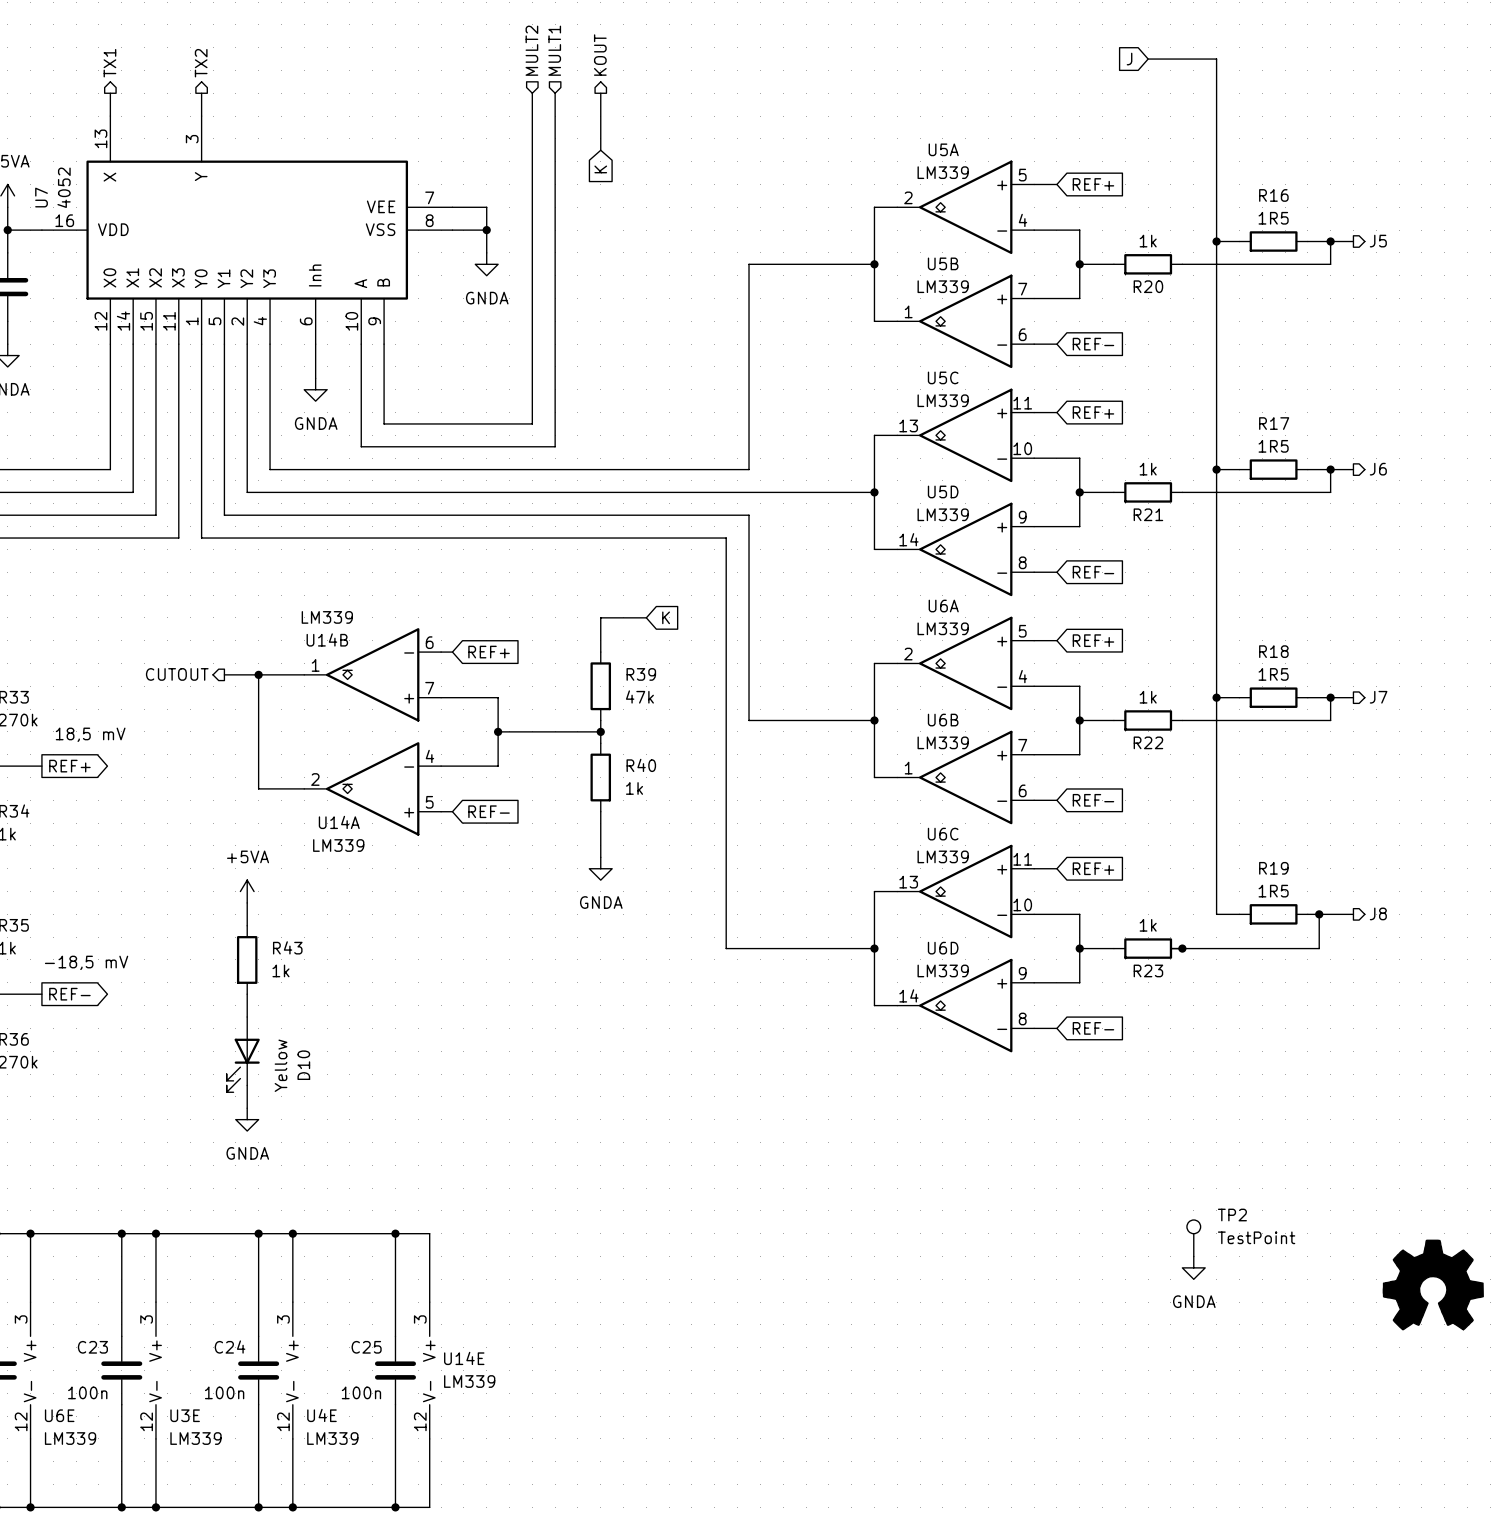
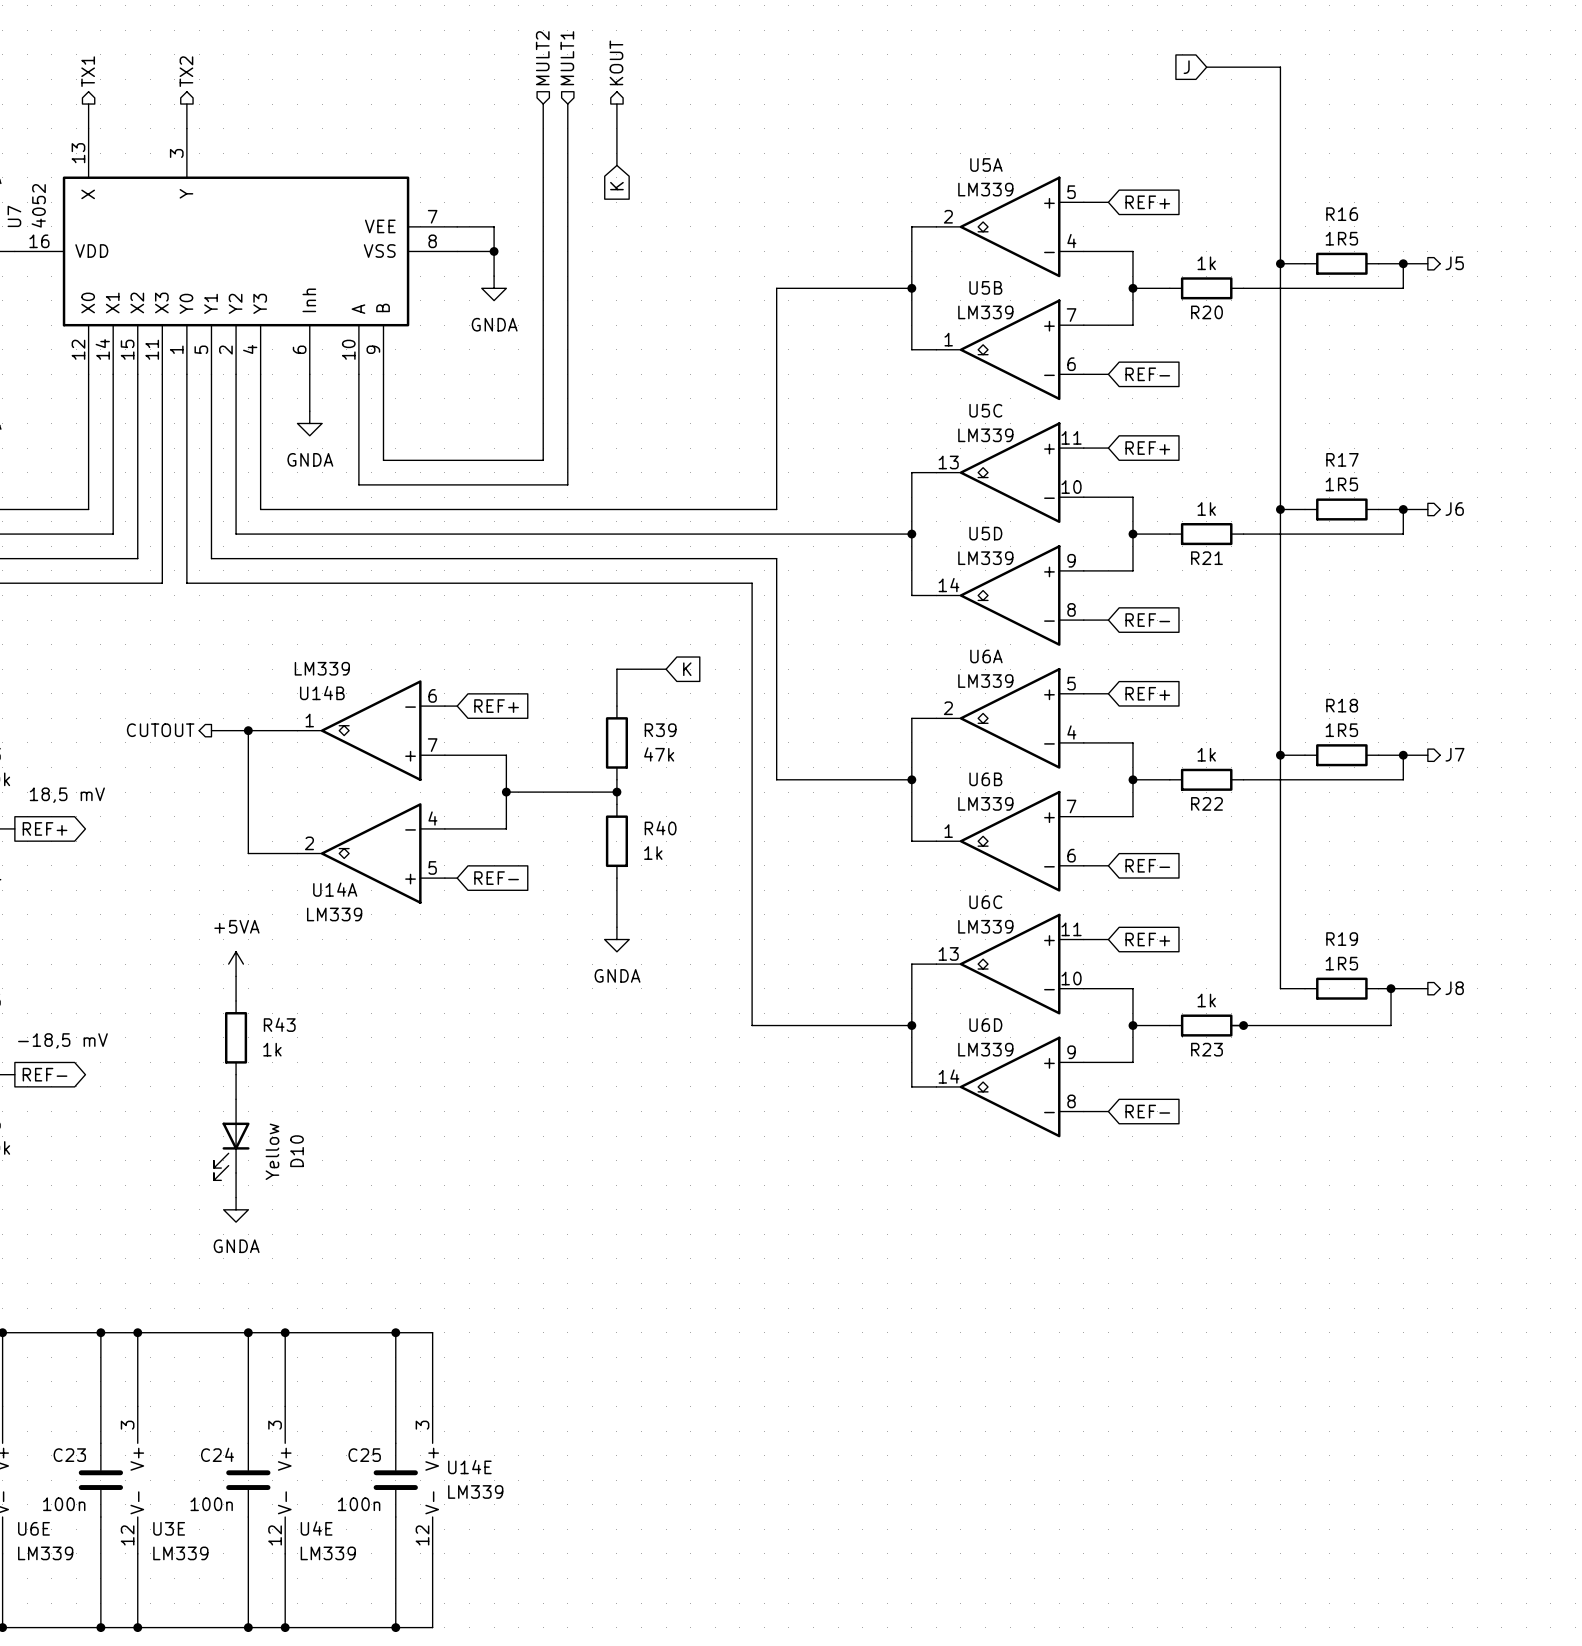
TP2: TestPoint (1193, 1238) -> none
power symbol: GNDA (1193, 1267) -> none
power symbol: (1433, 1285) -> none

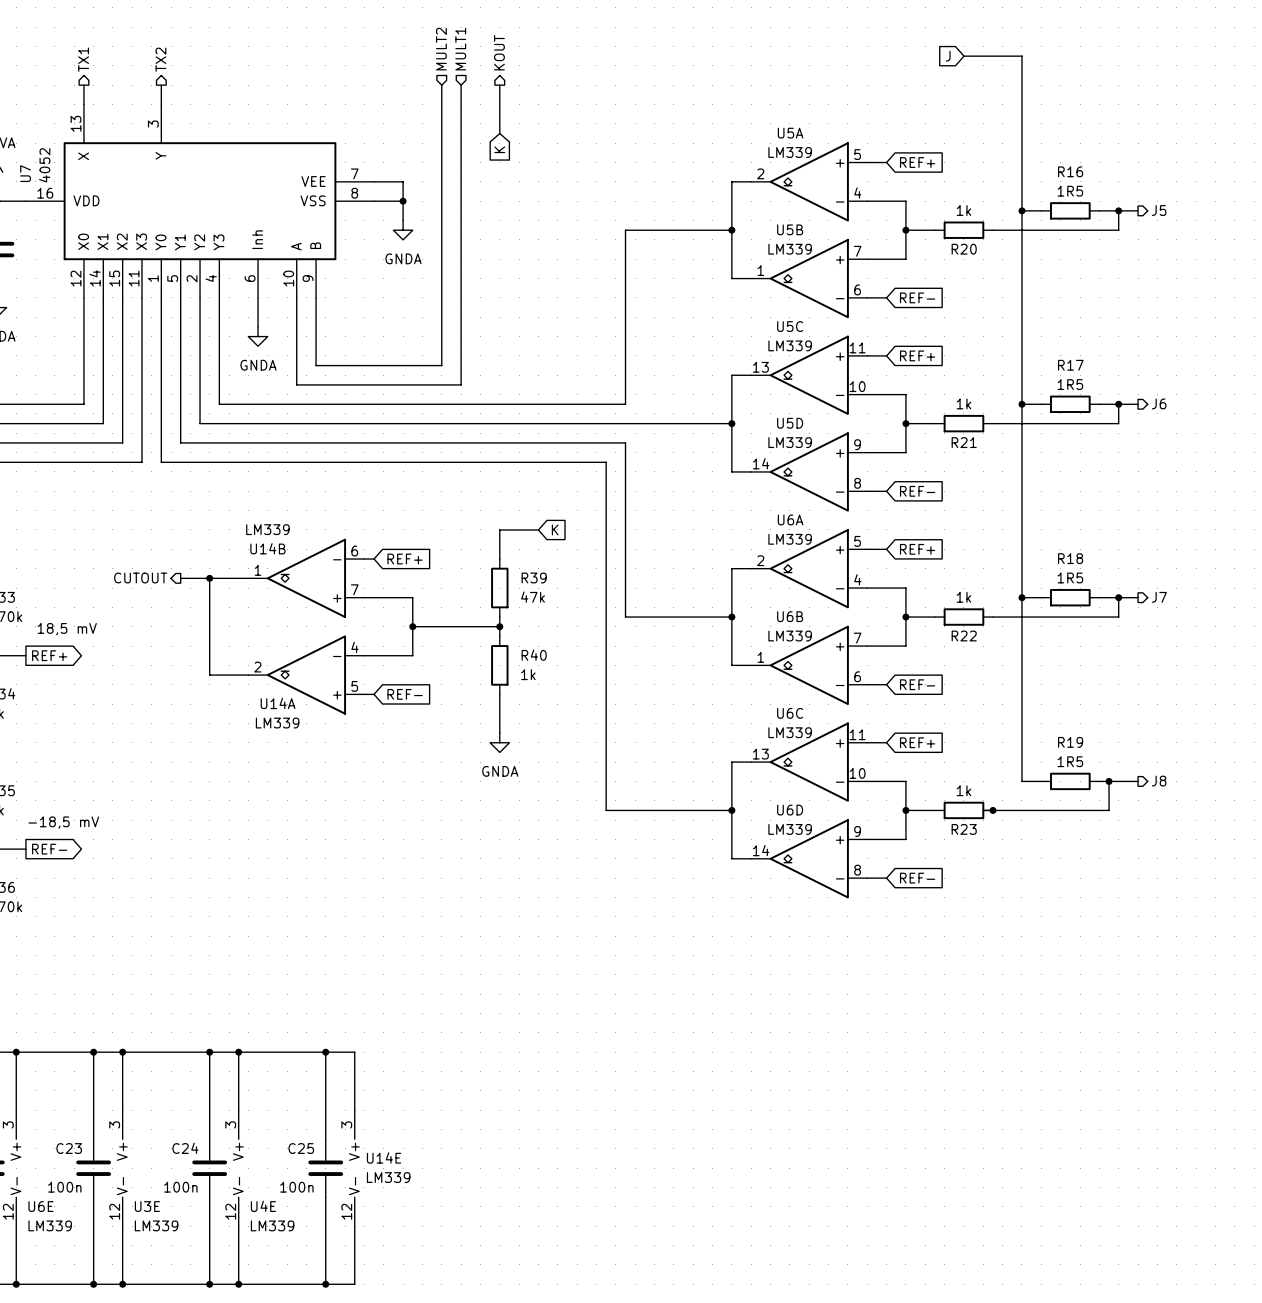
power symbol: +5VA (236, 964) -> none
wire: (236, 976) (236, 1000) -> none
R43: 1k (236, 1037) -> none
wire: (236, 1074) (236, 1099) -> none
D10: Yellow (231, 1139) -> none
wire: (236, 1172) (236, 1197) -> none
power symbol: GNDA (236, 1209) -> none

